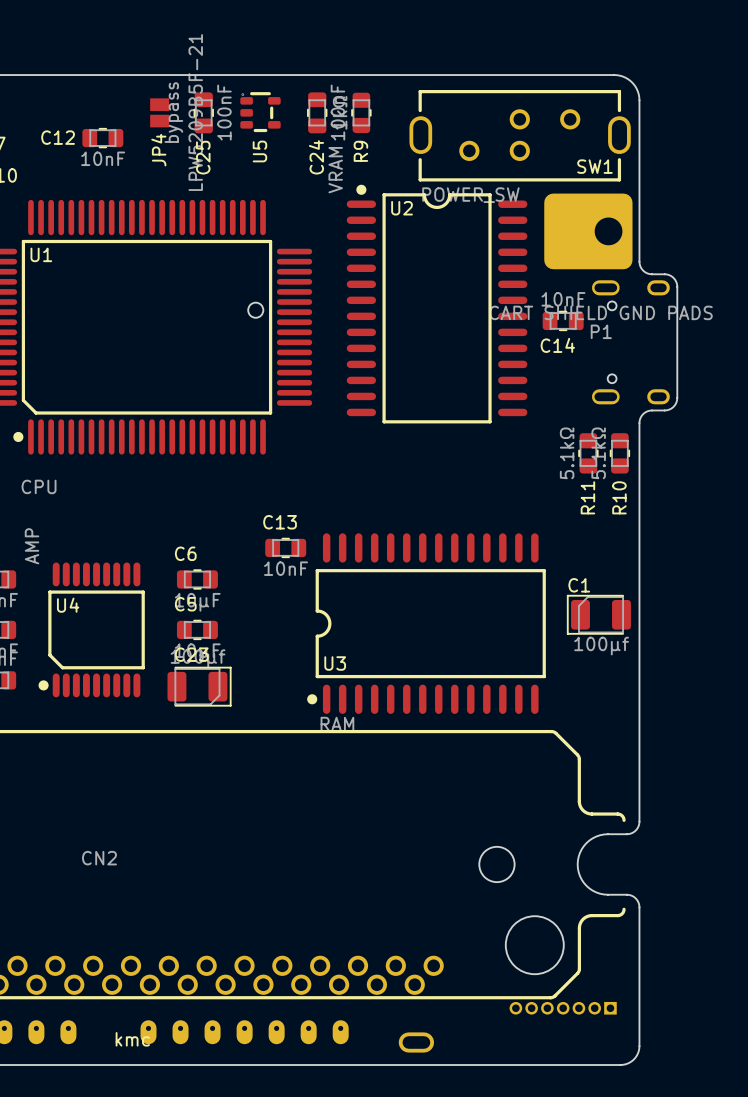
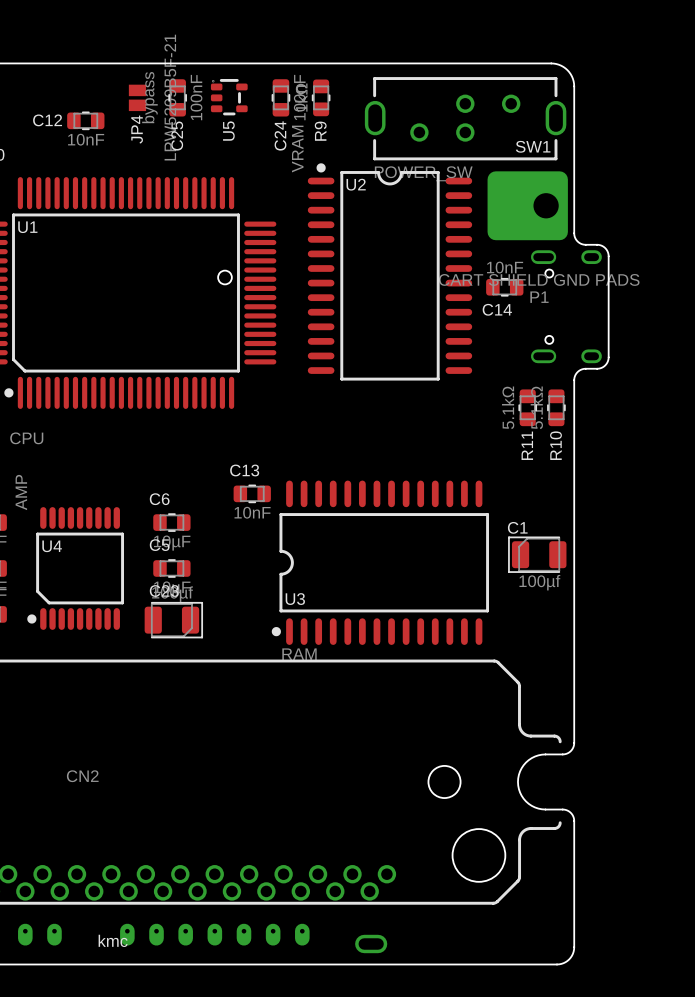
part: (563, 1008) -> none

